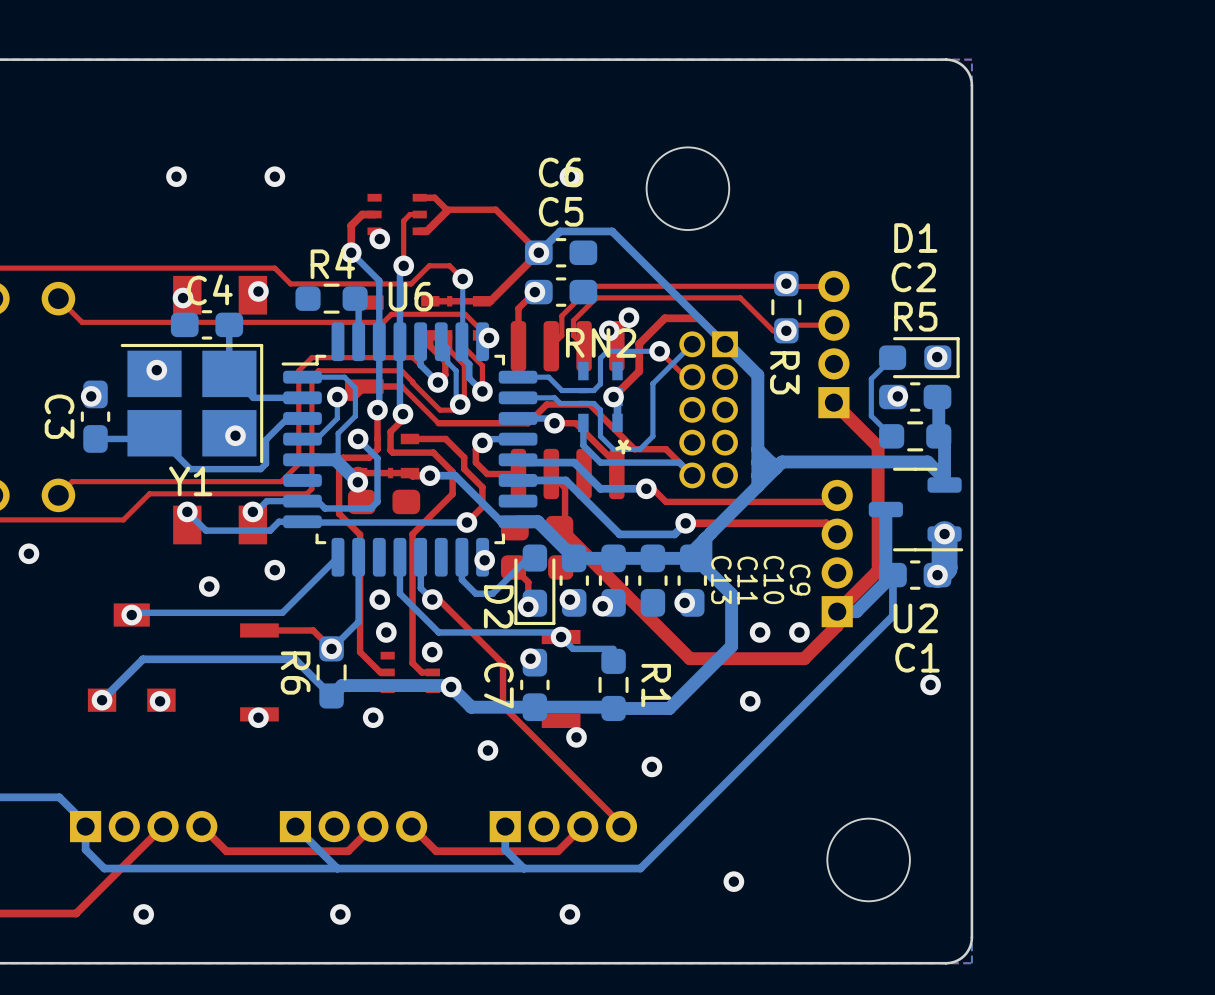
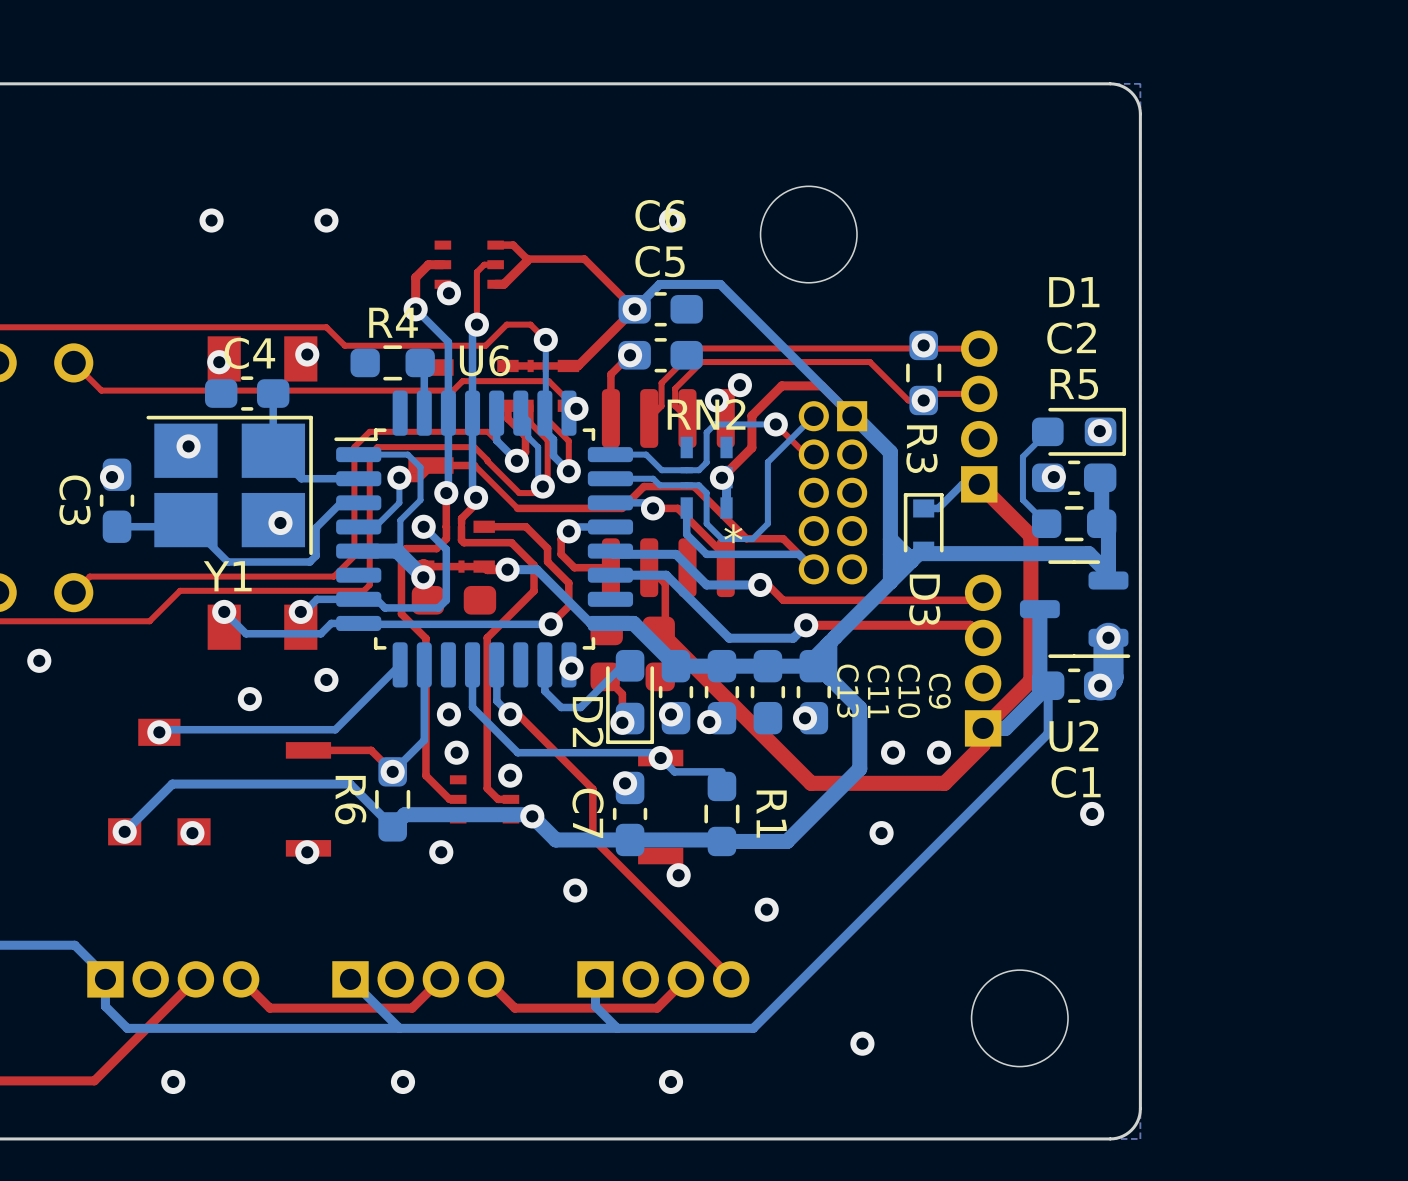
bottom track: none -> (979, 484) (962, 484) (938, 508) (923, 508)
D3: none -> (923, 526)

